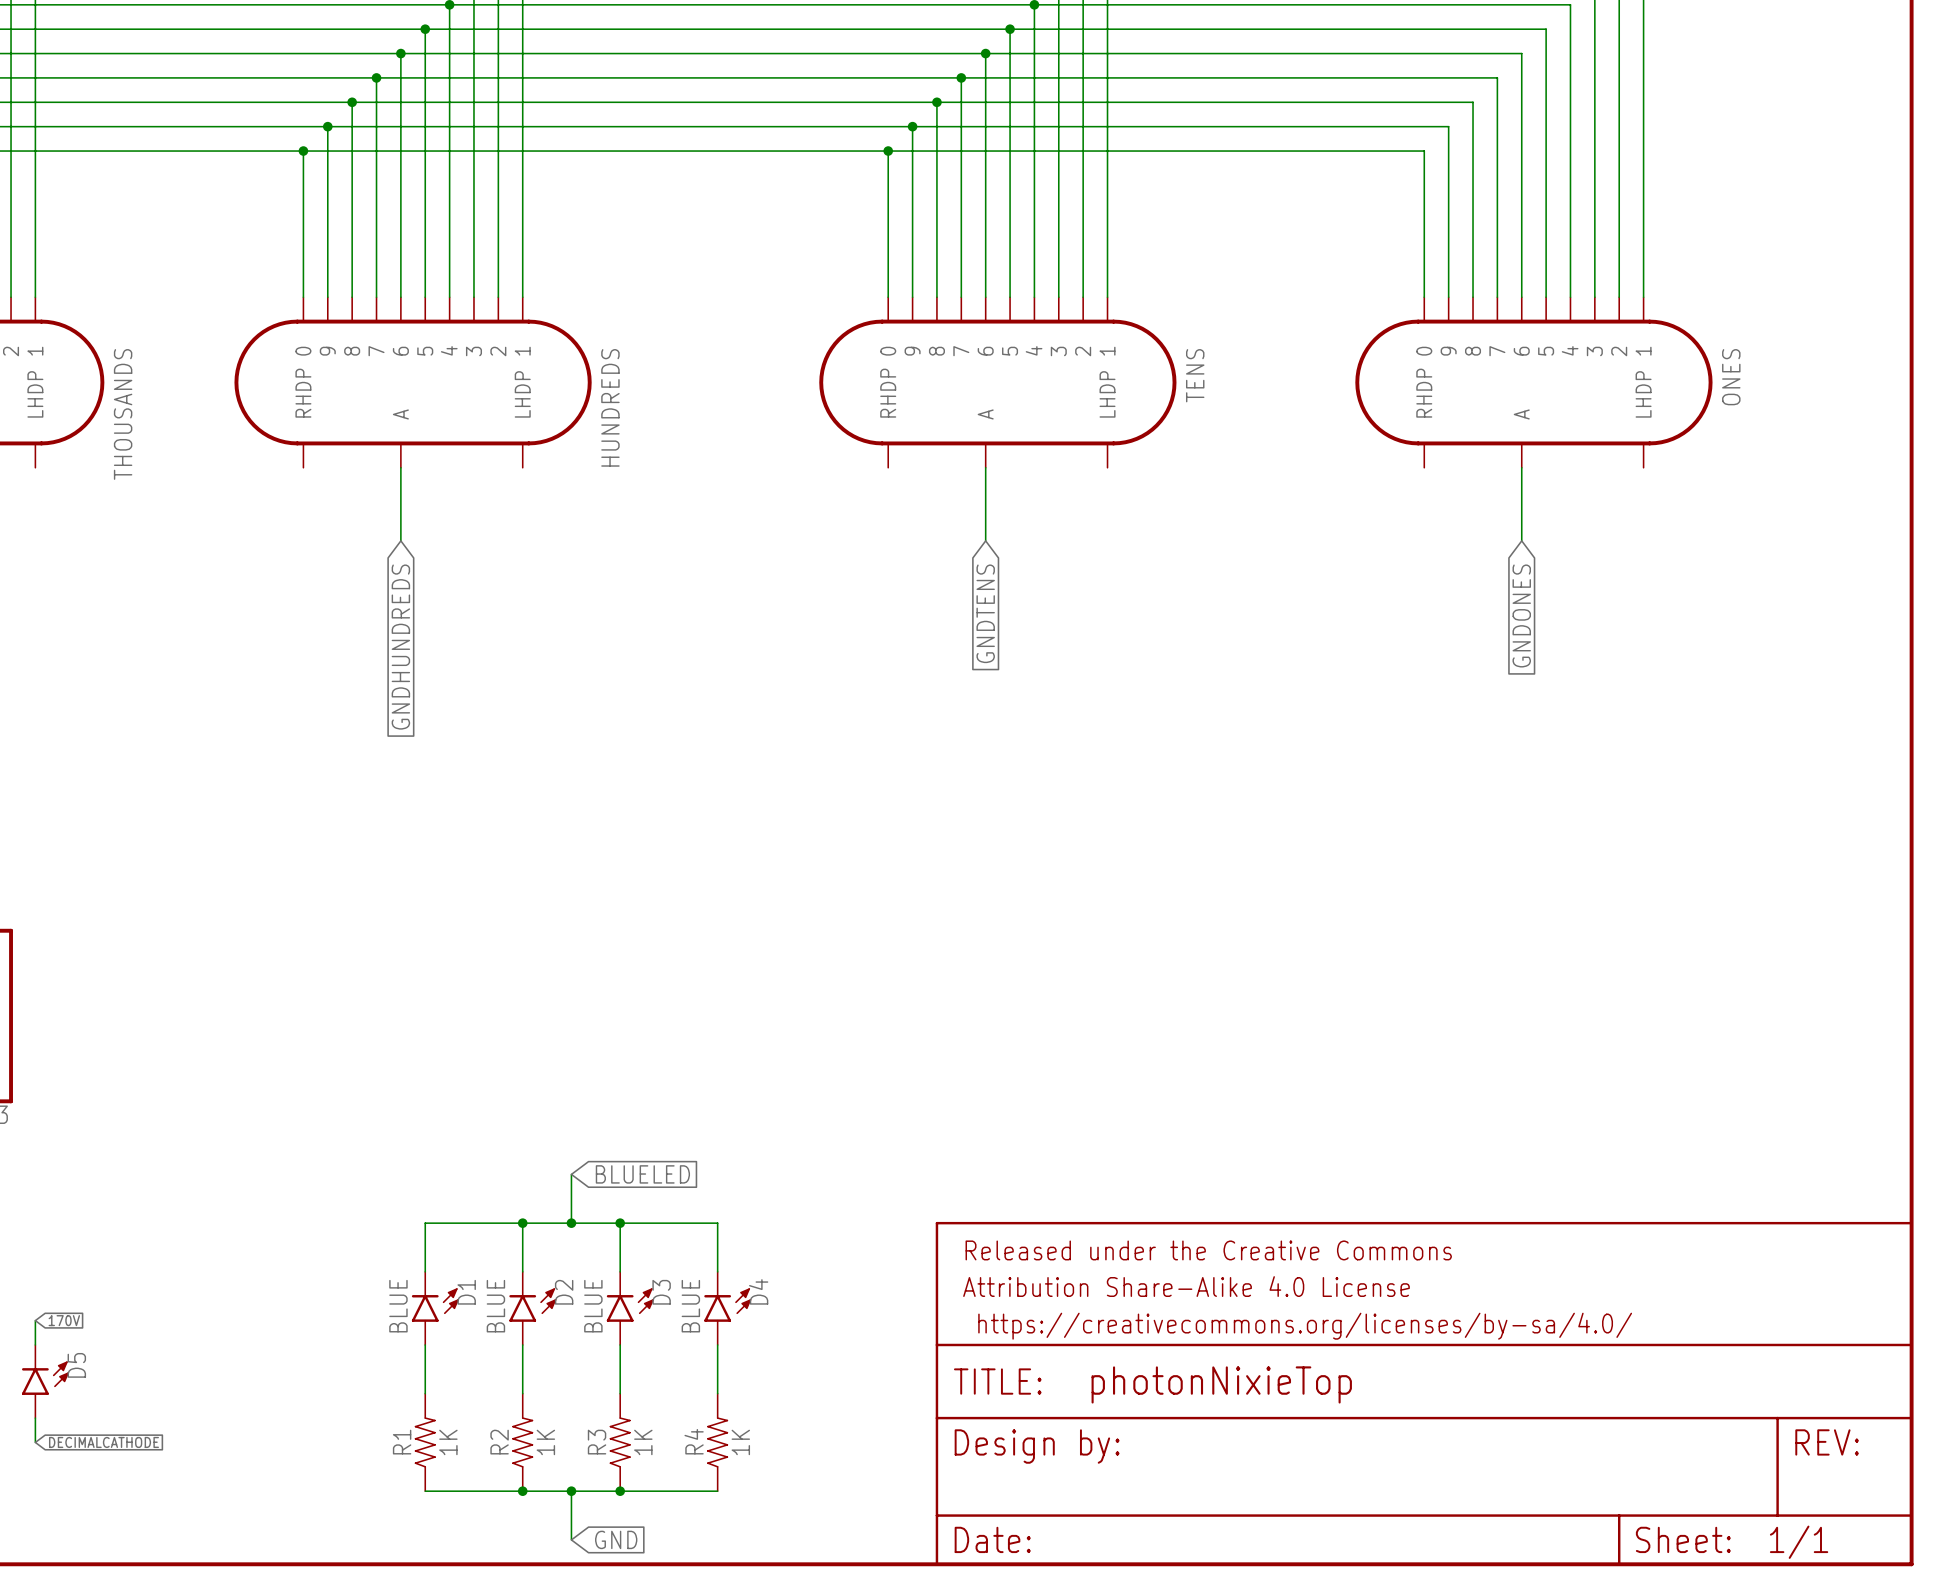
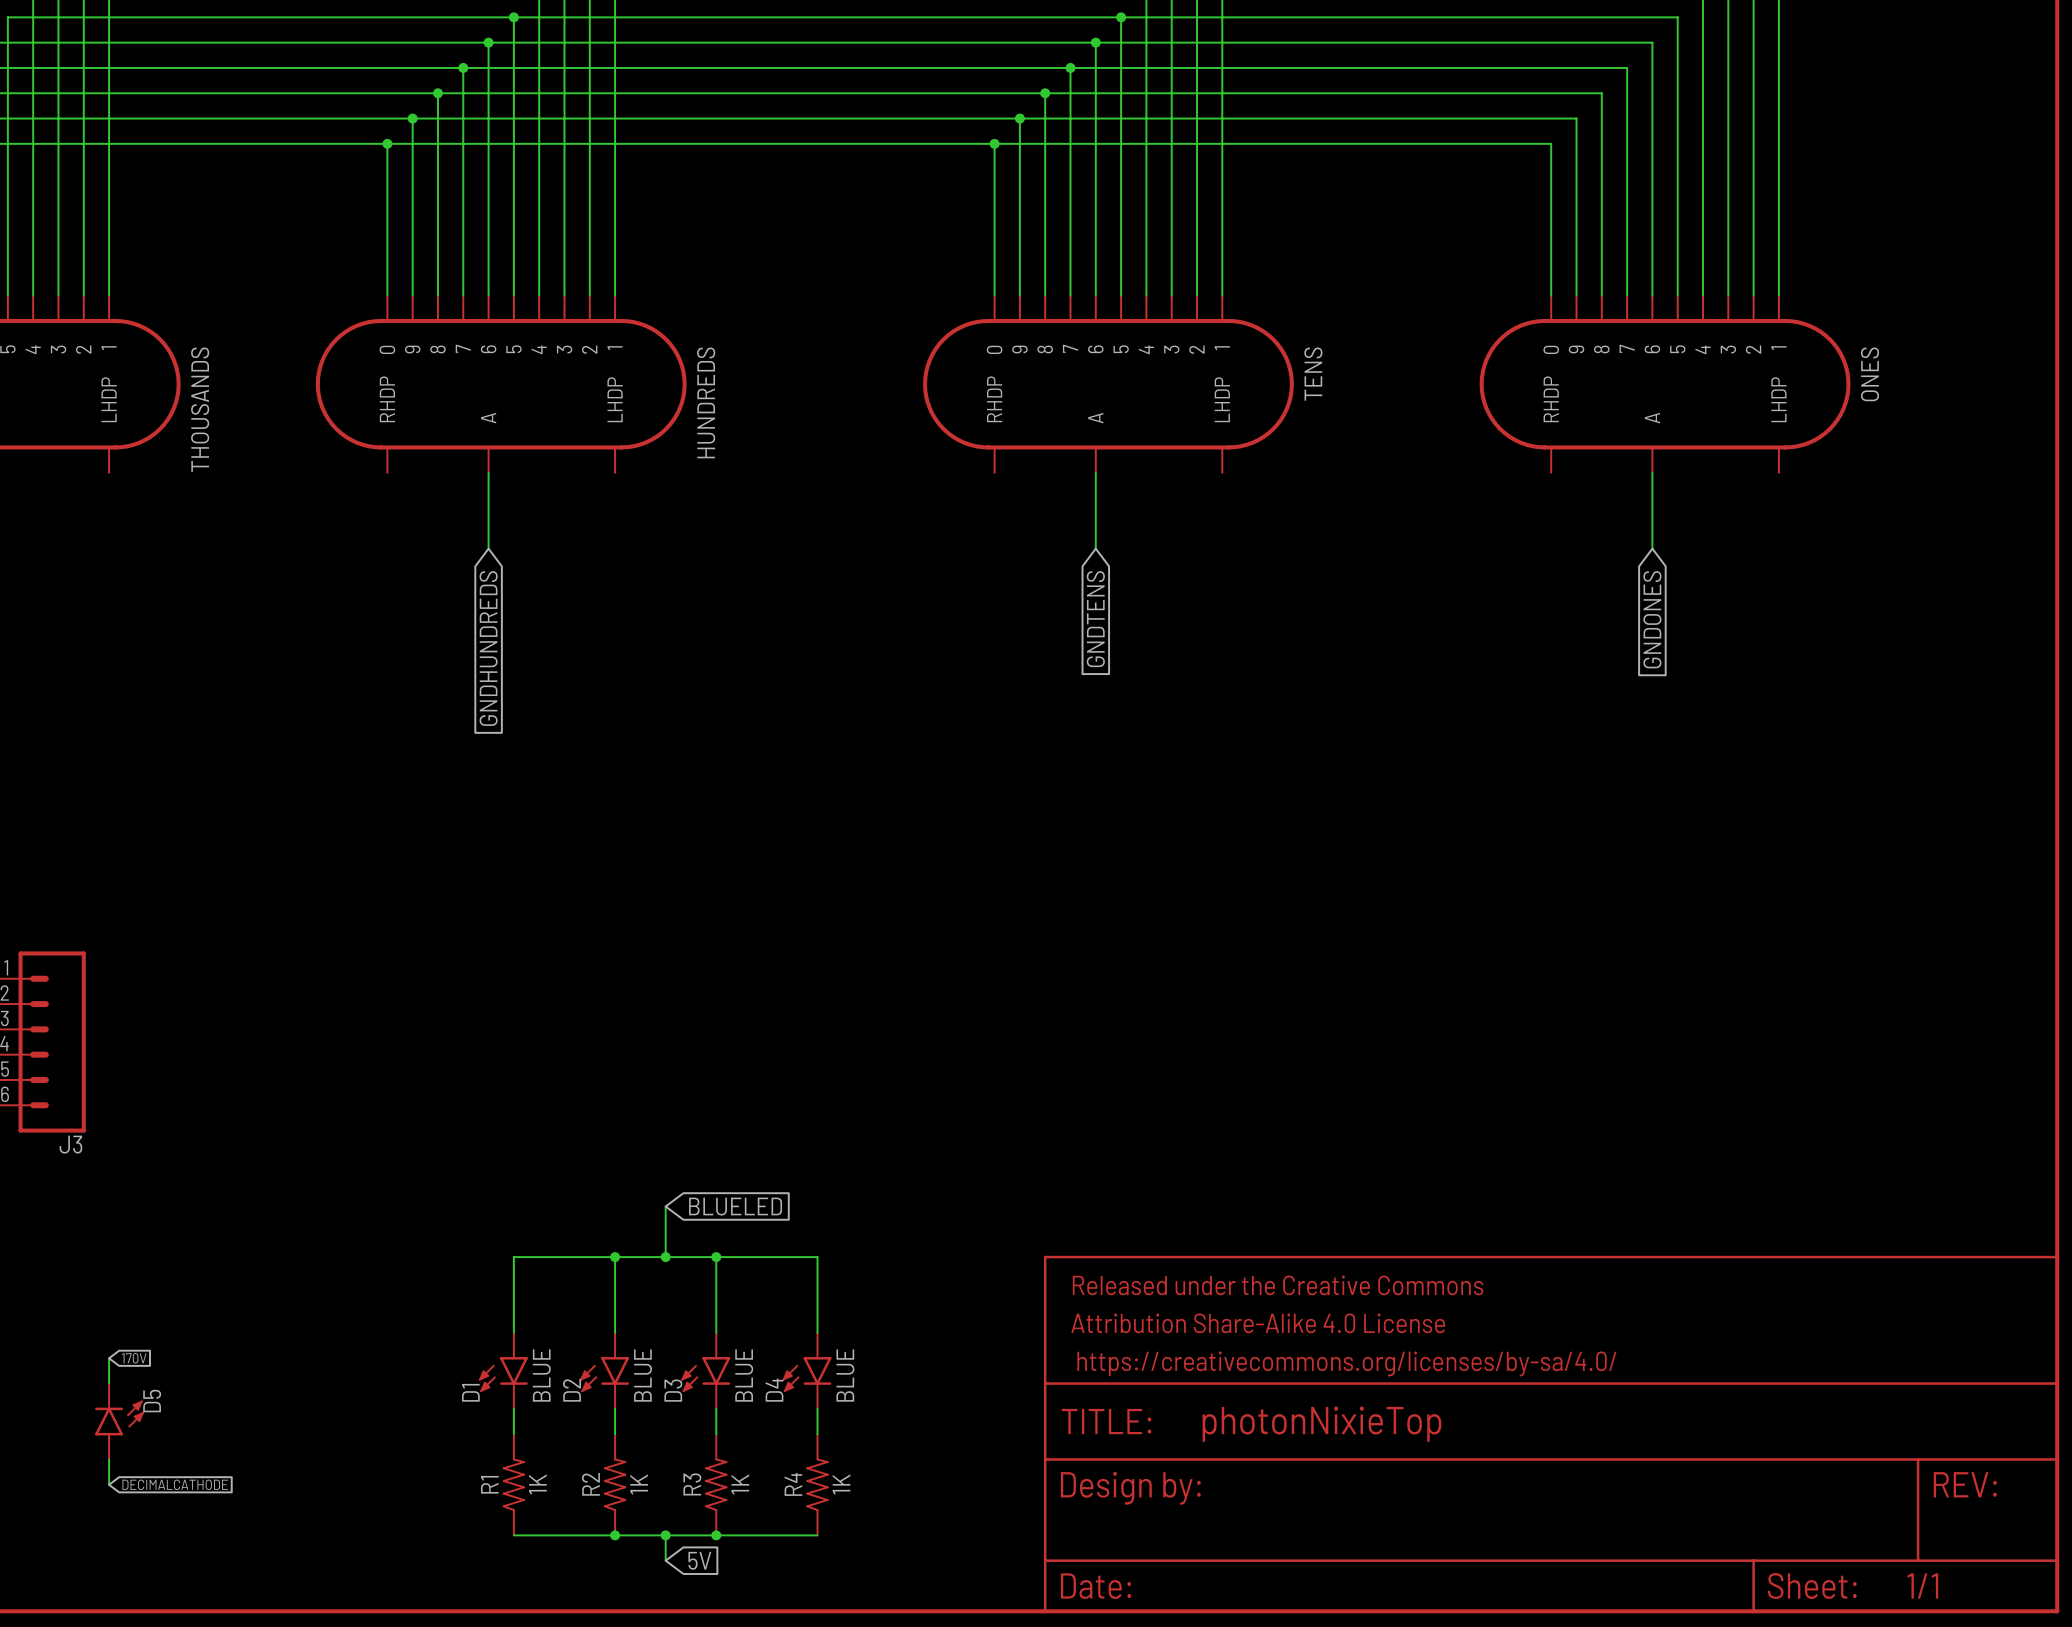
D1 rotation: 0° (435, 1305) -> 180° (503, 1374)
D2 rotation: 0° (532, 1305) -> 180° (604, 1374)
D3 rotation: 0° (630, 1305) -> 180° (705, 1374)
D4 rotation: 0° (727, 1305) -> 180° (806, 1374)
wire: (571, 1515) (571, 1539) -> none
global label: none -> 5V (699, 1560)
global label: GND (616, 1539) -> none

